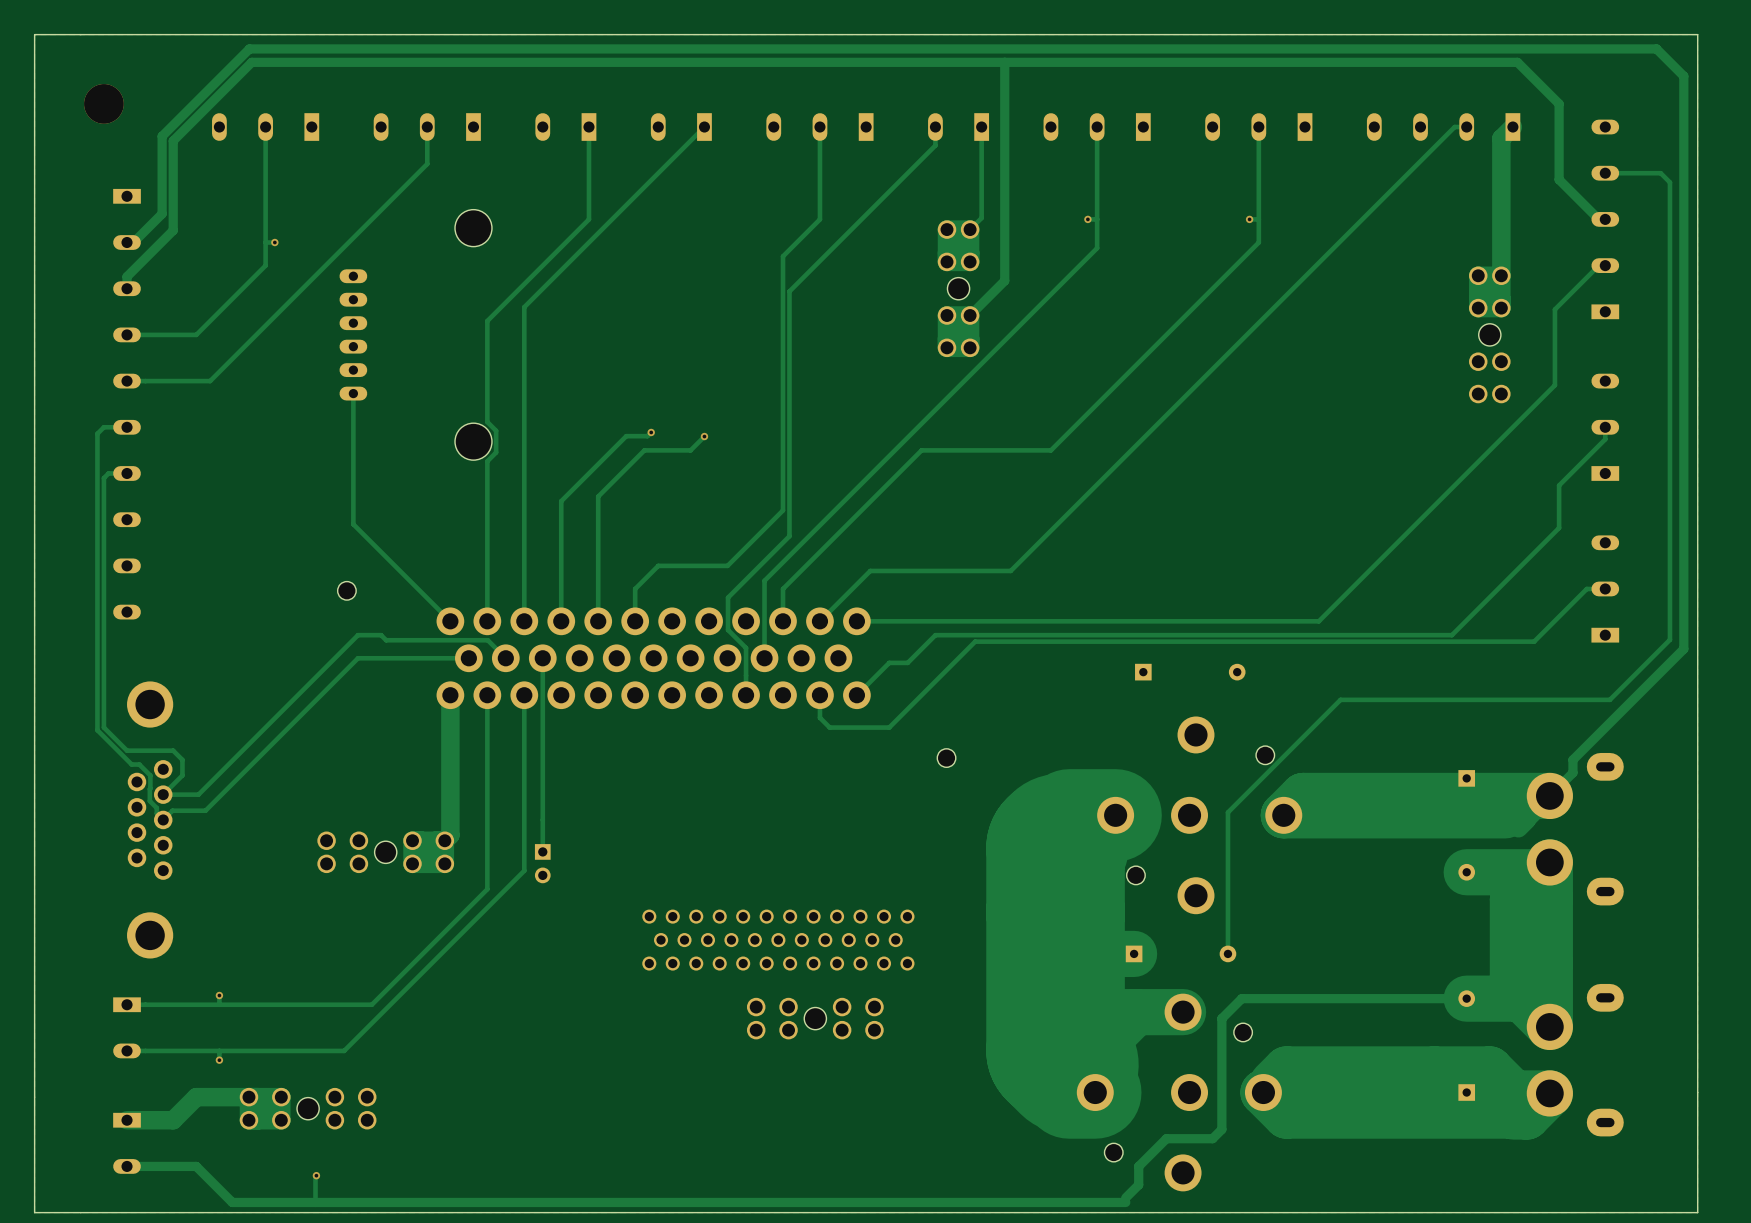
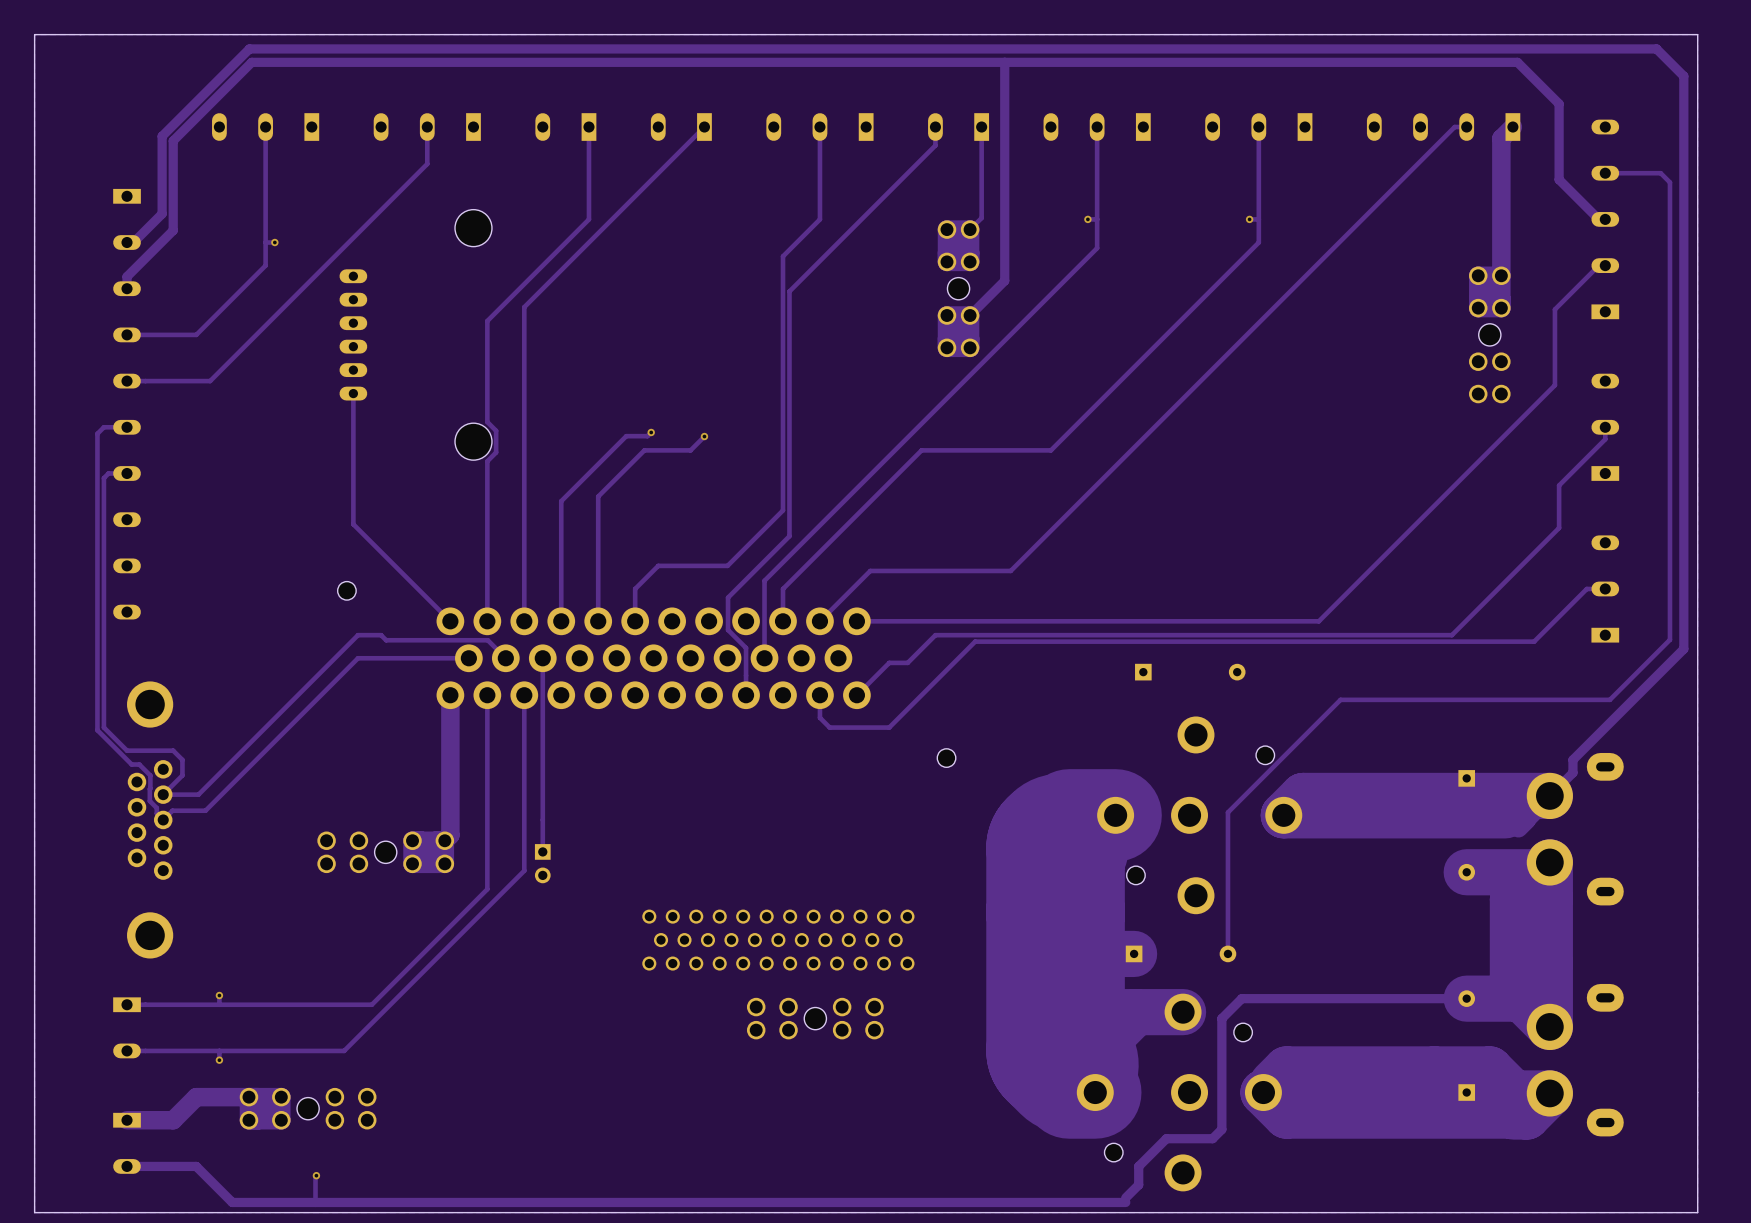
part: (103, 103) -> none

